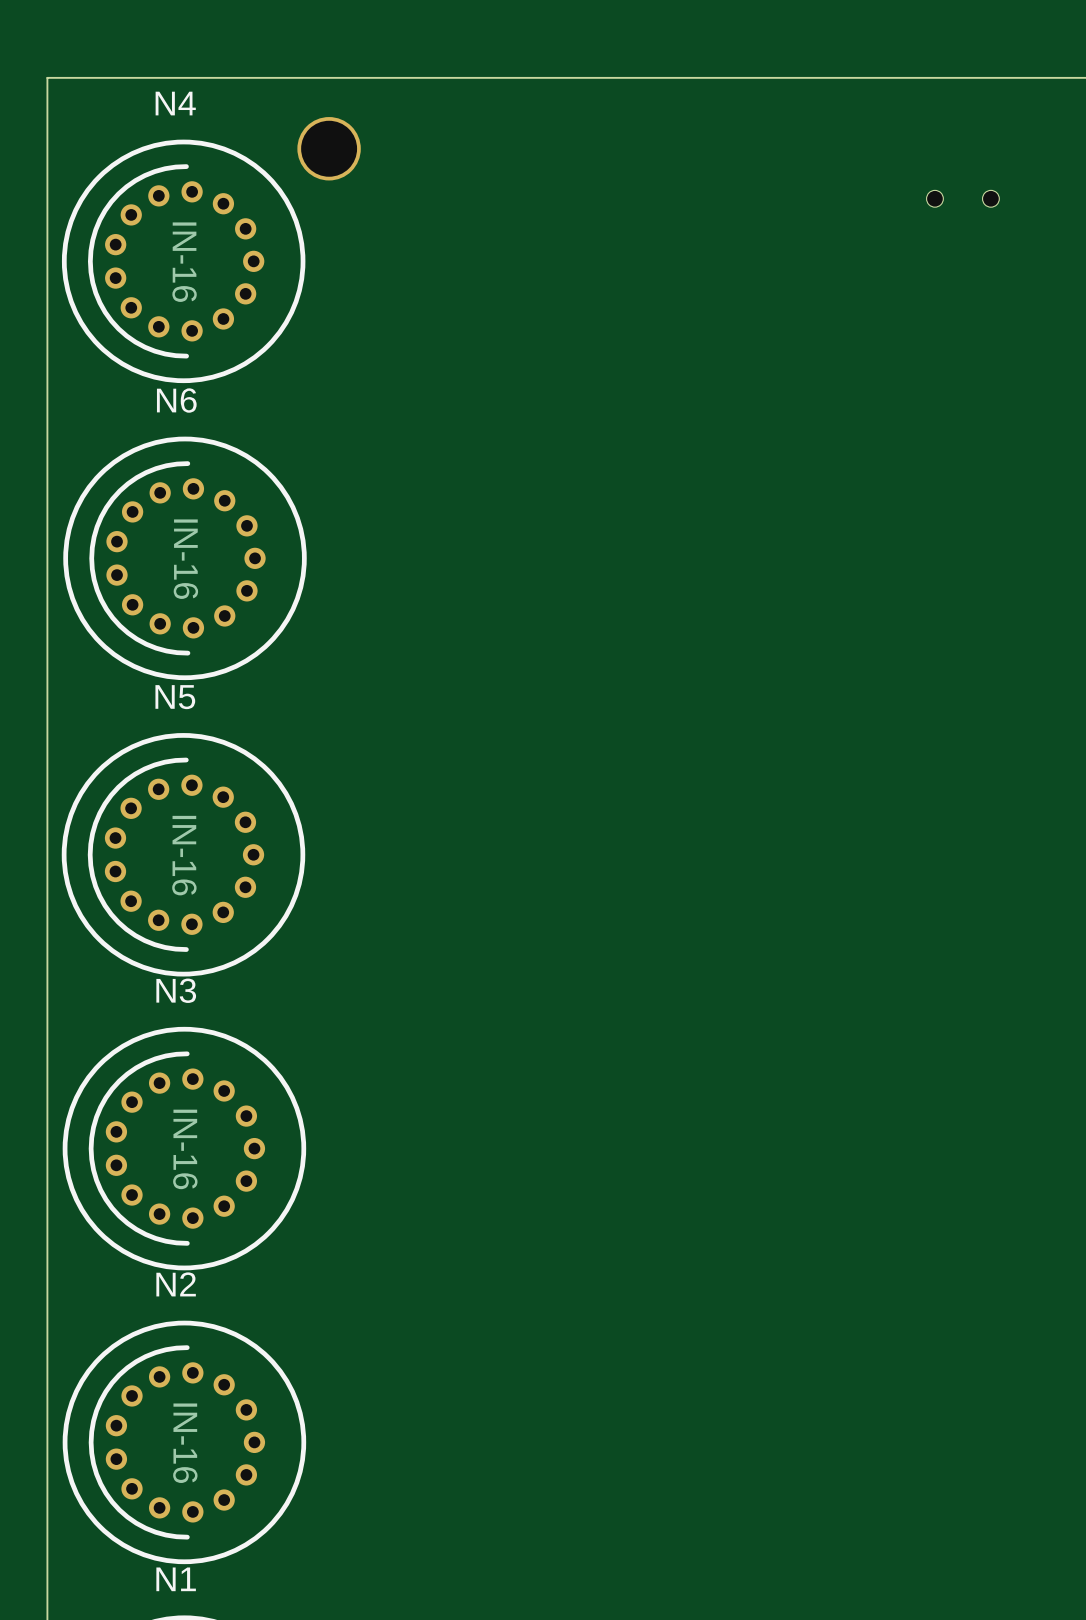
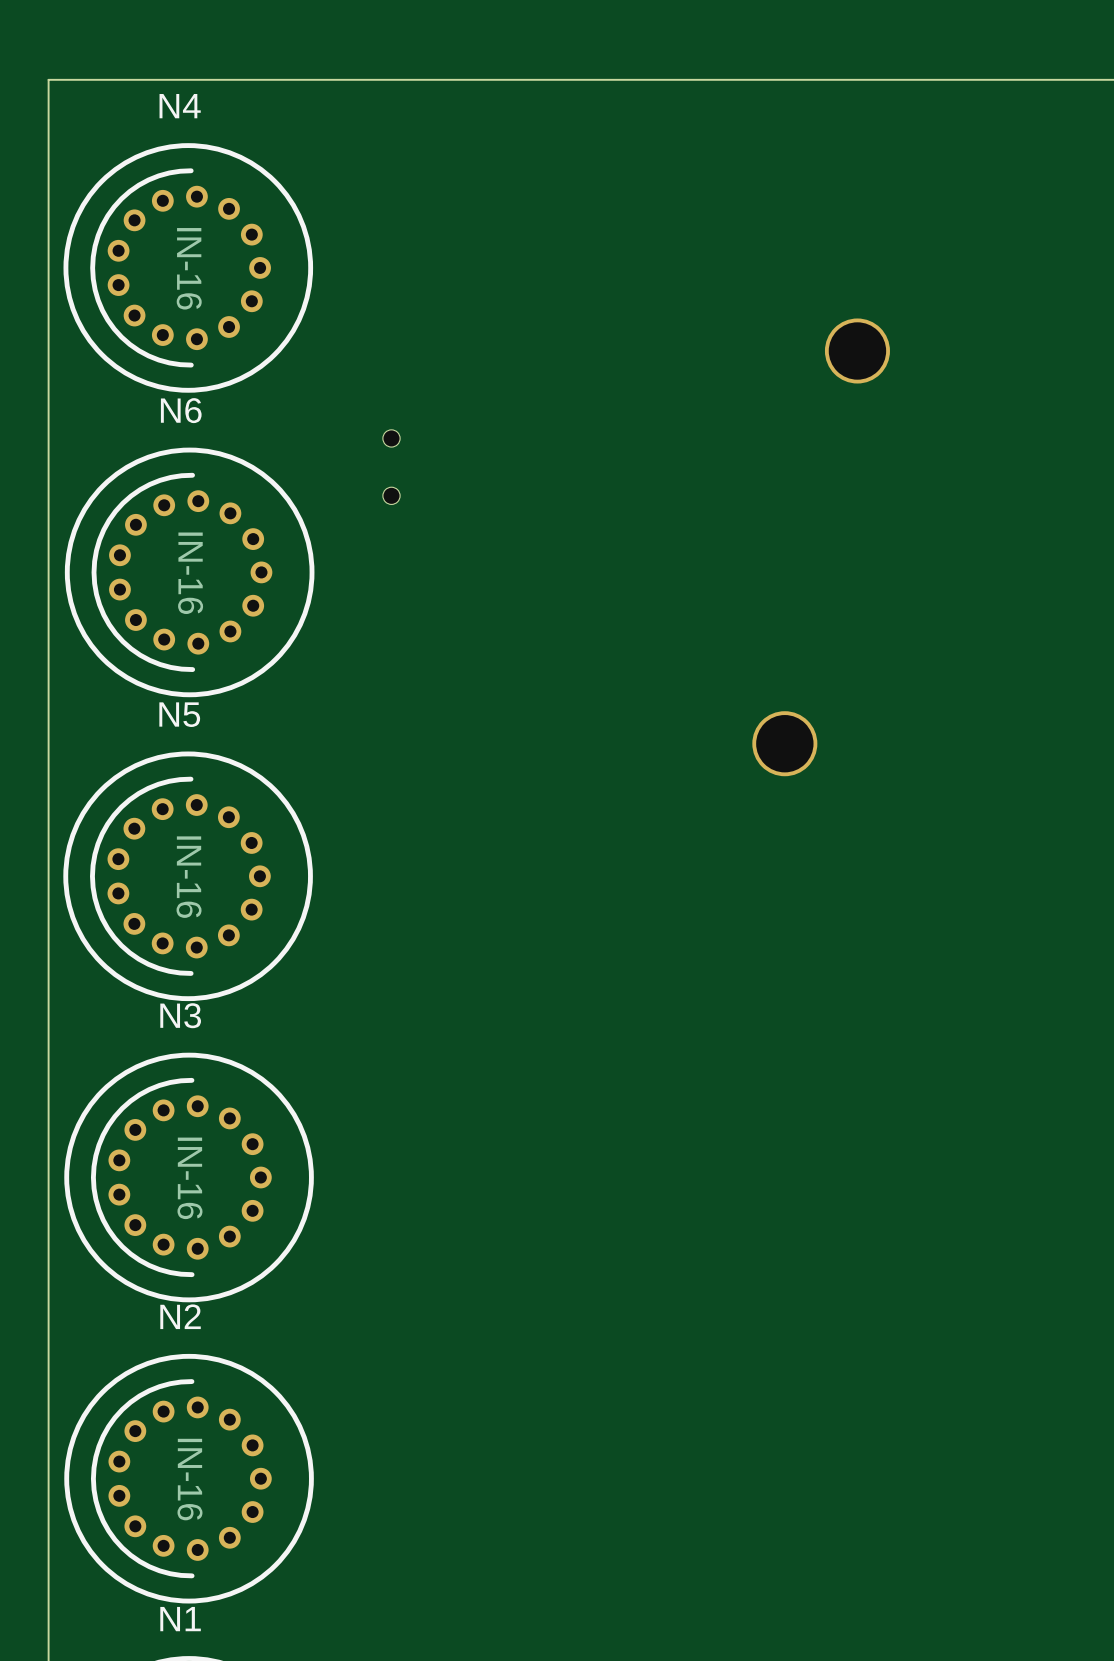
part: (329, 148) -> none
part: (962, 198) -> none
part: none -> (857, 351)
part: none -> (391, 467)
part: none -> (784, 743)

